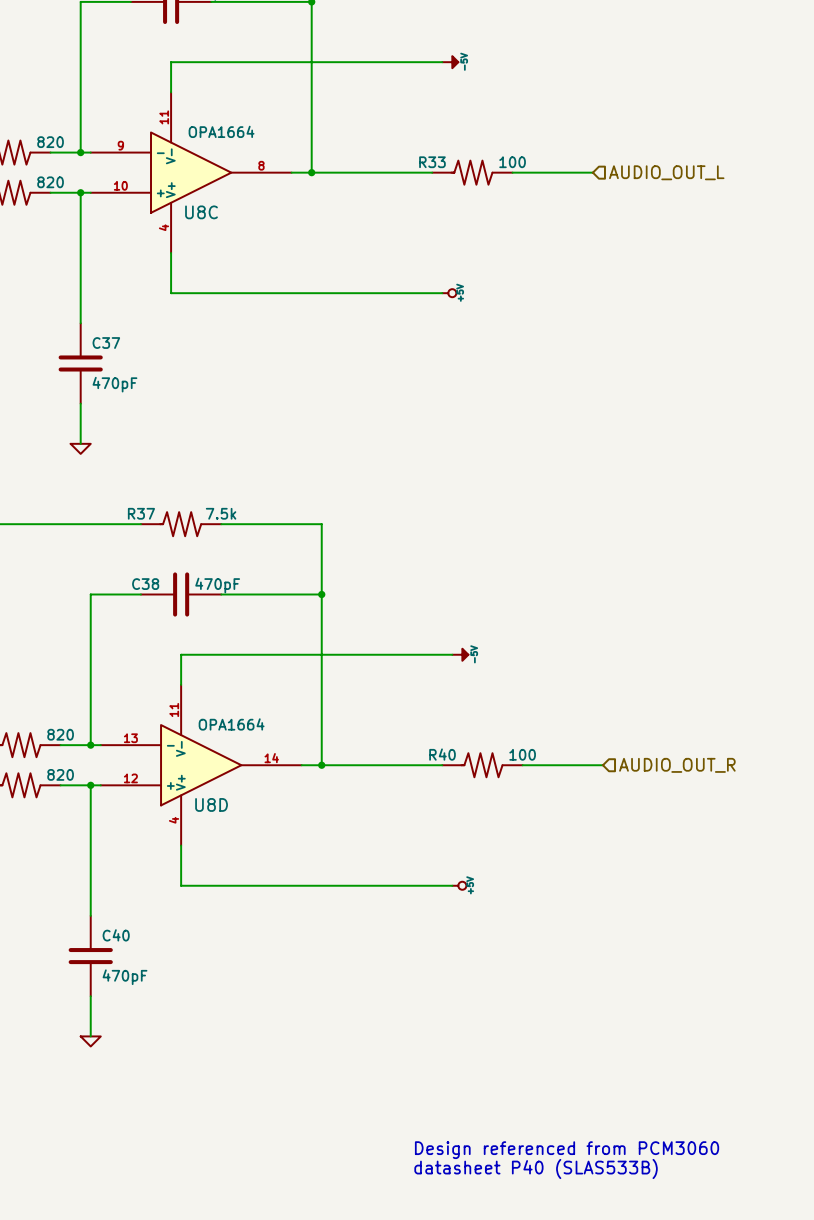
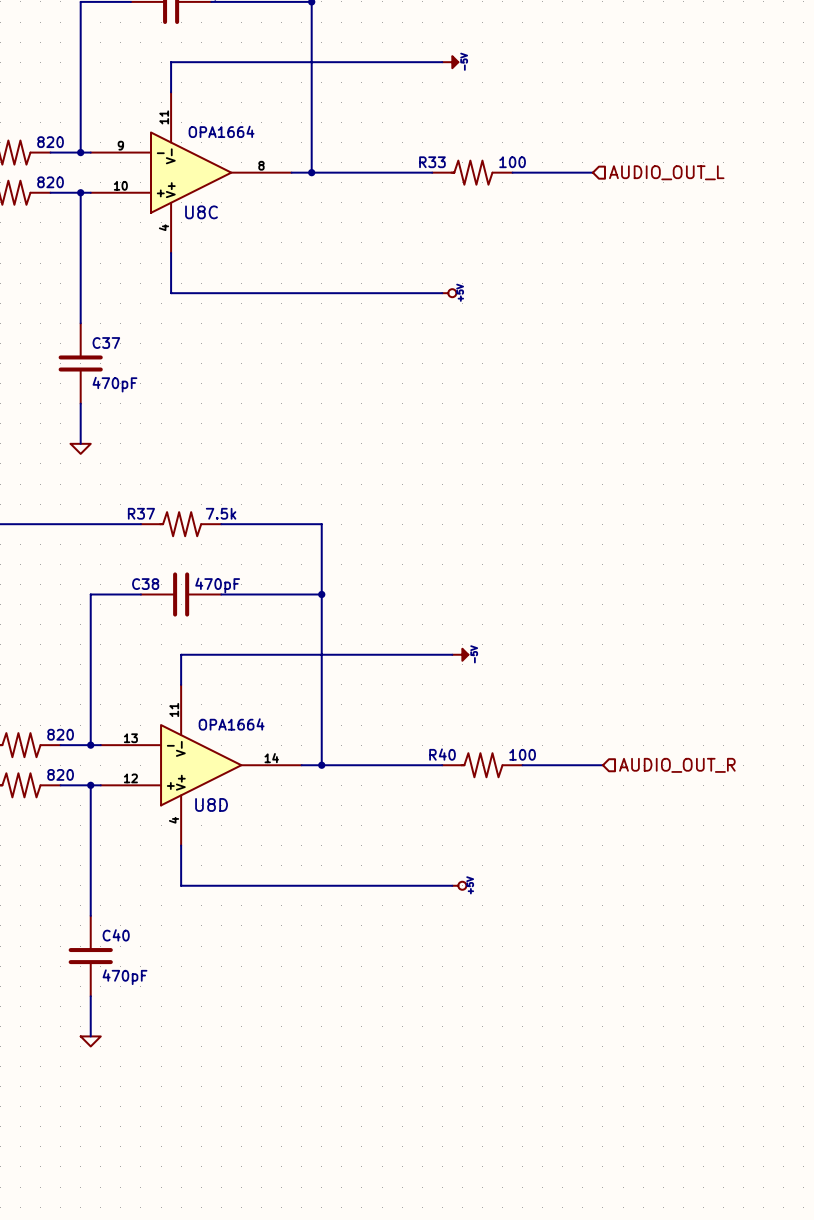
text: Design referenced from PCM3060 (567, 1150) -> none
text: datasheet P40 (SLAS533B) (536, 1168) -> none

